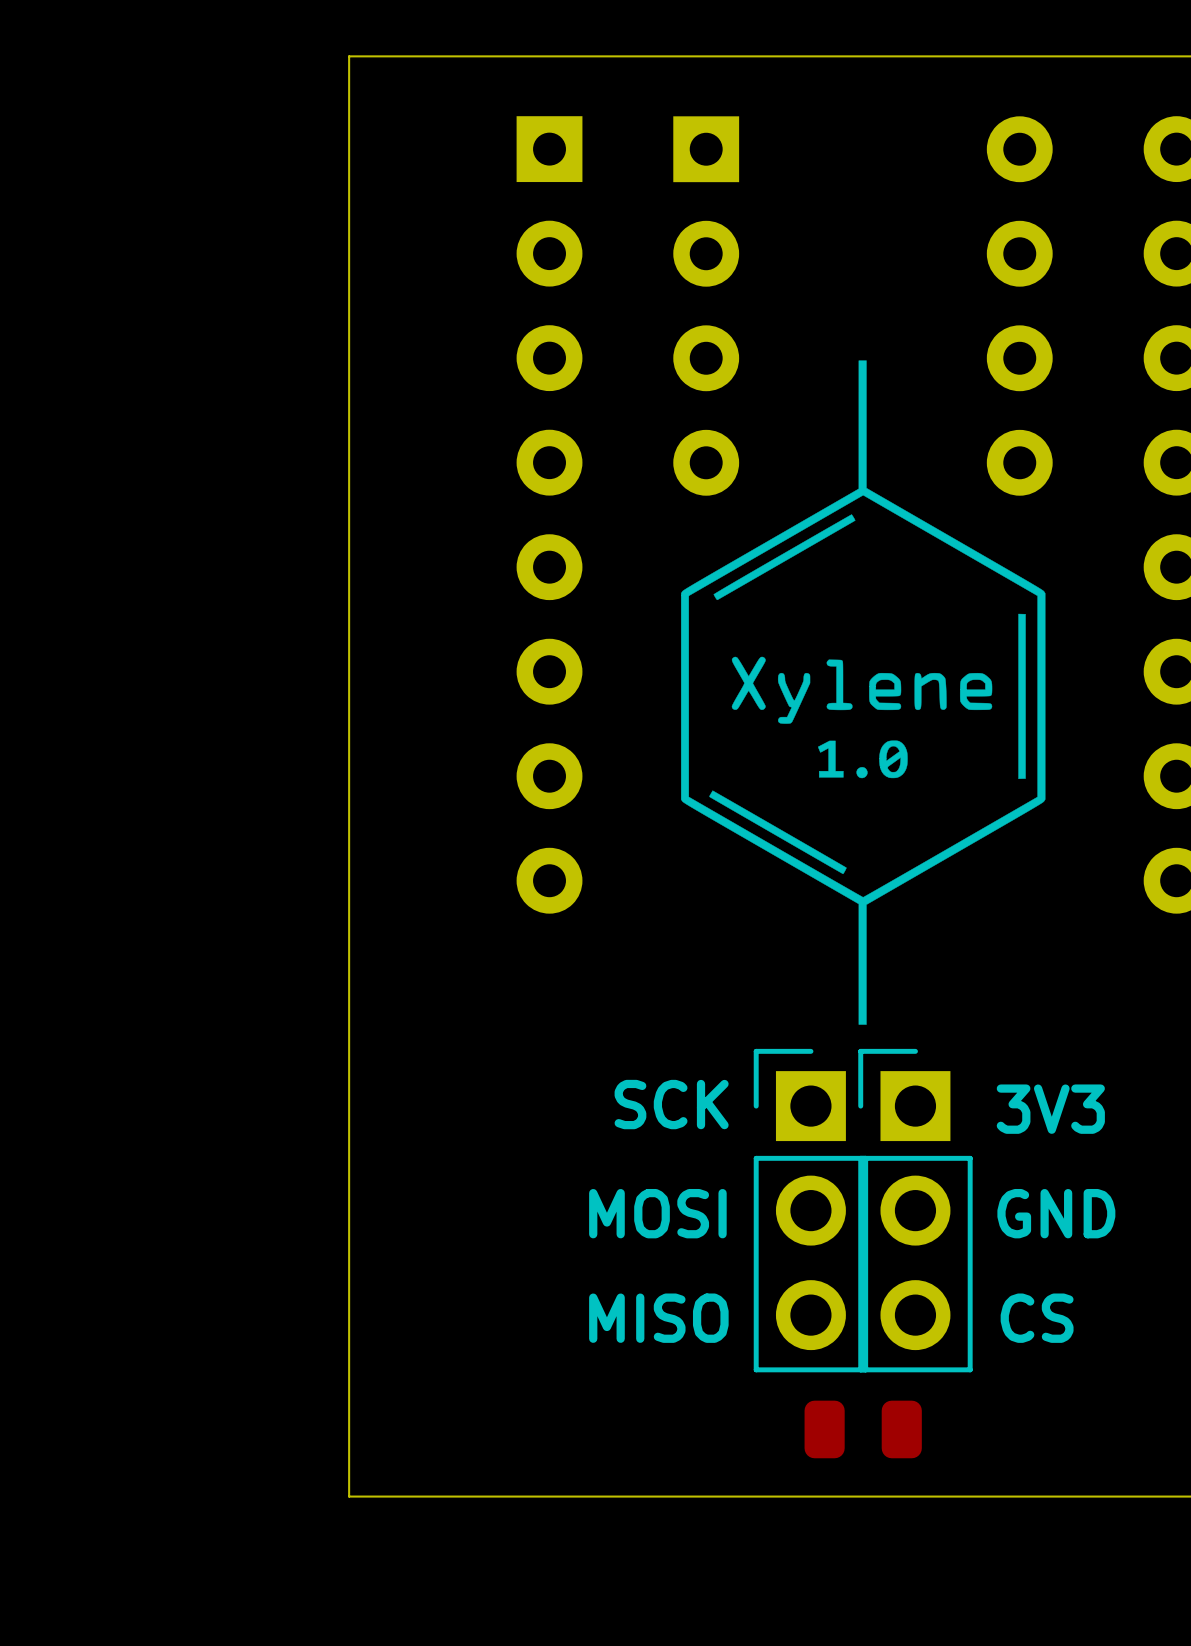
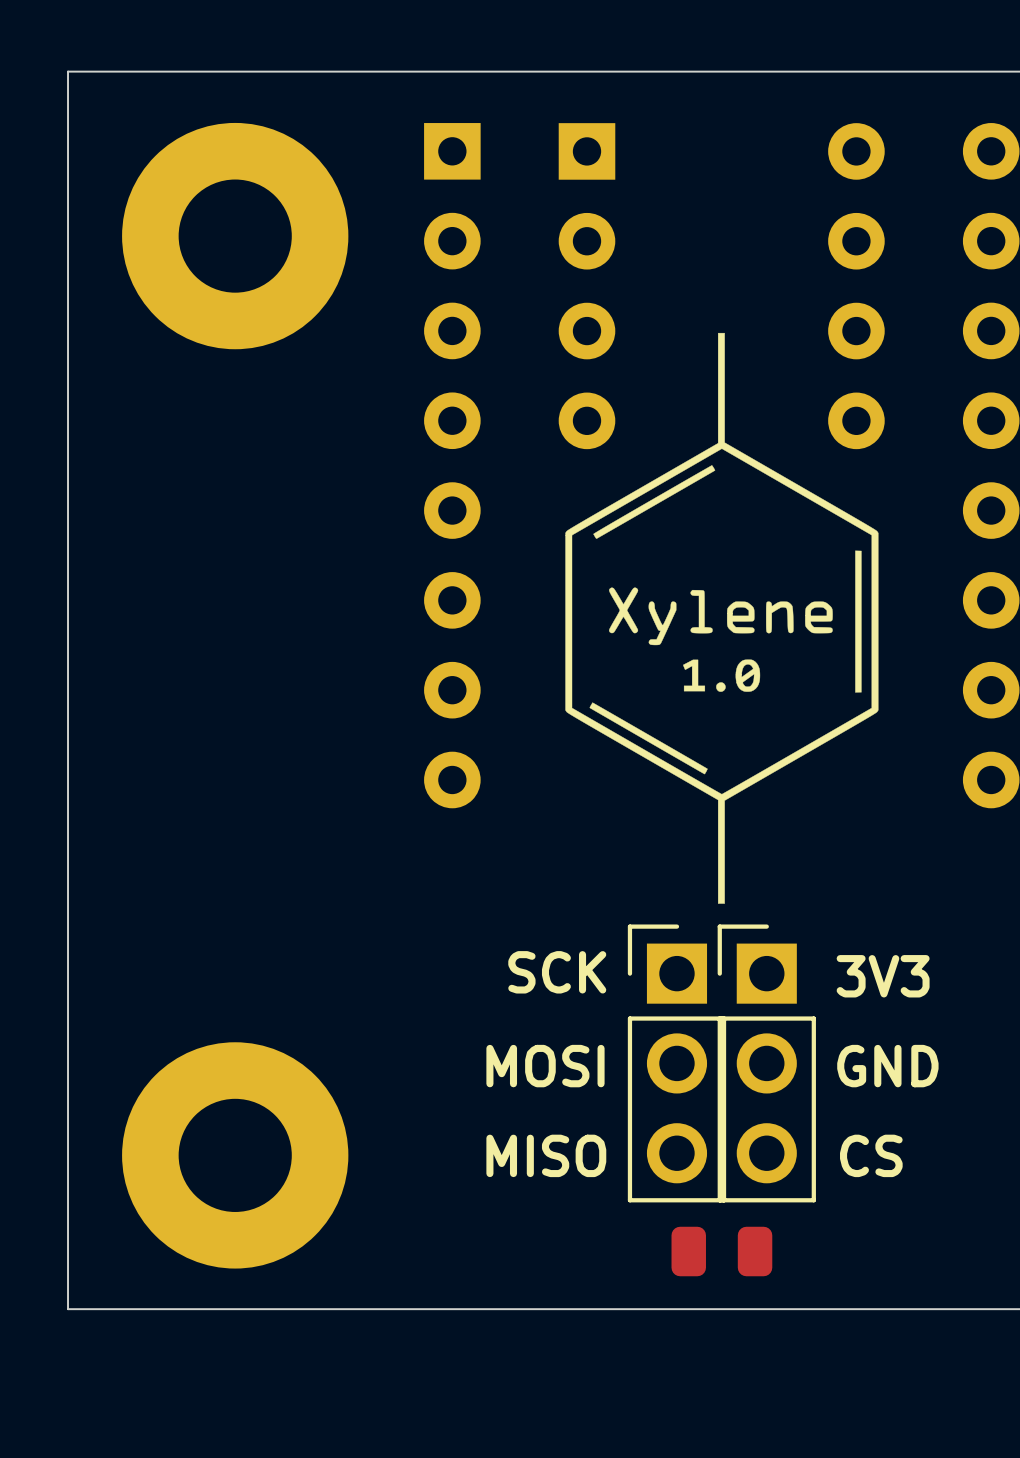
board edge: (349, 56) (349, 1496) -> (280, 71) (68, 71) (68, 1309) (280, 1309)
part: none -> (235, 236)
part: none -> (235, 1155)

